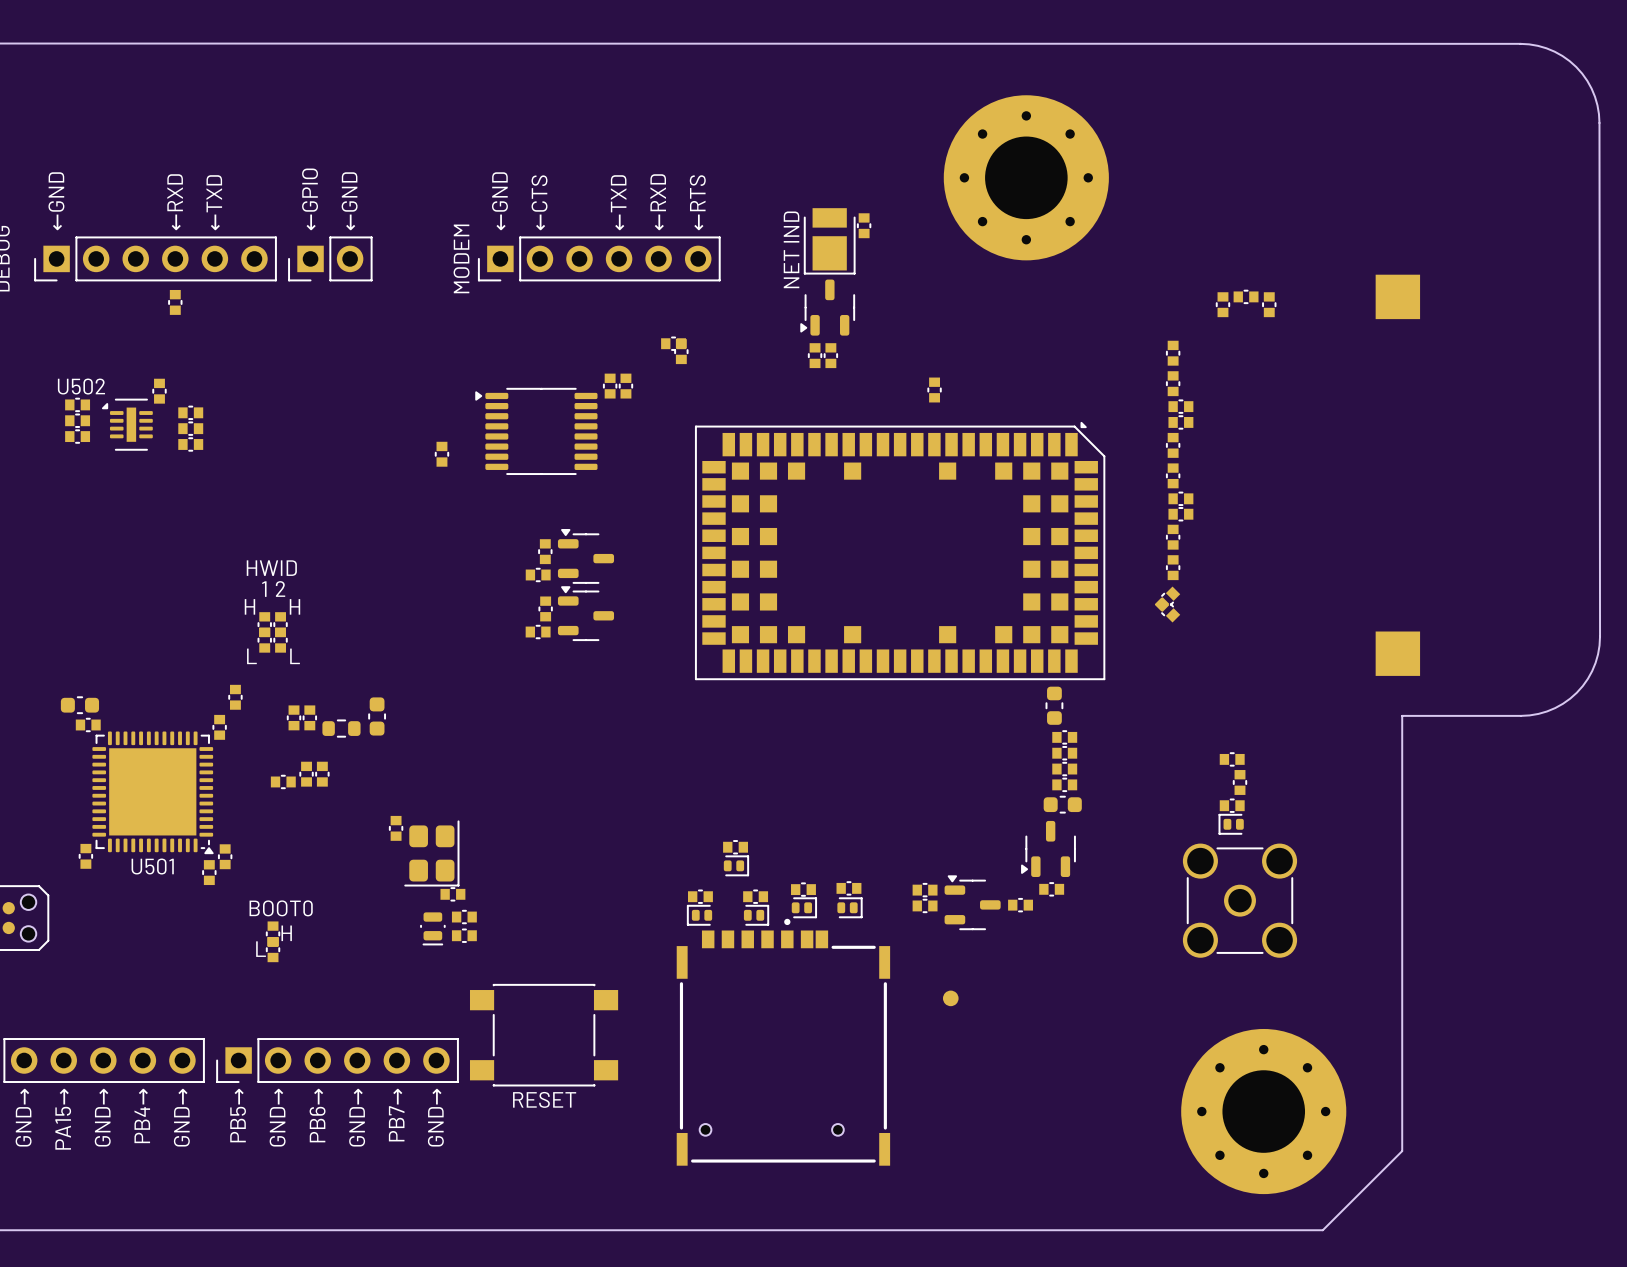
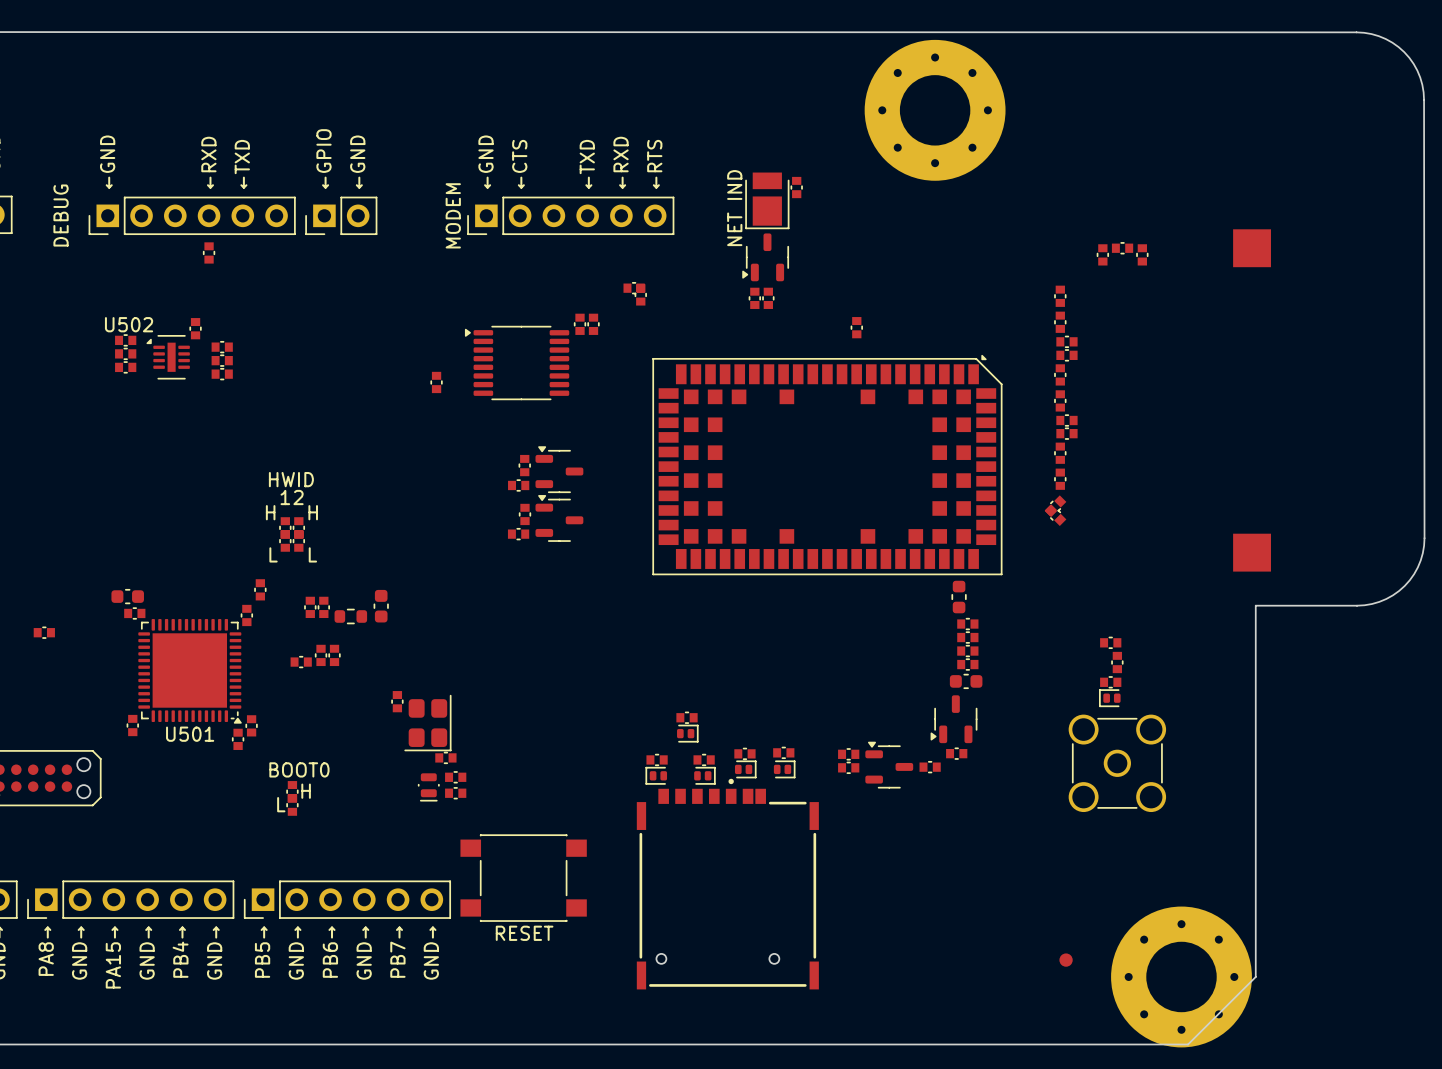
part position: (1026, 177) -> (935, 110)
part position: (950, 998) -> (1066, 960)
part position: (1263, 1111) -> (1181, 976)

